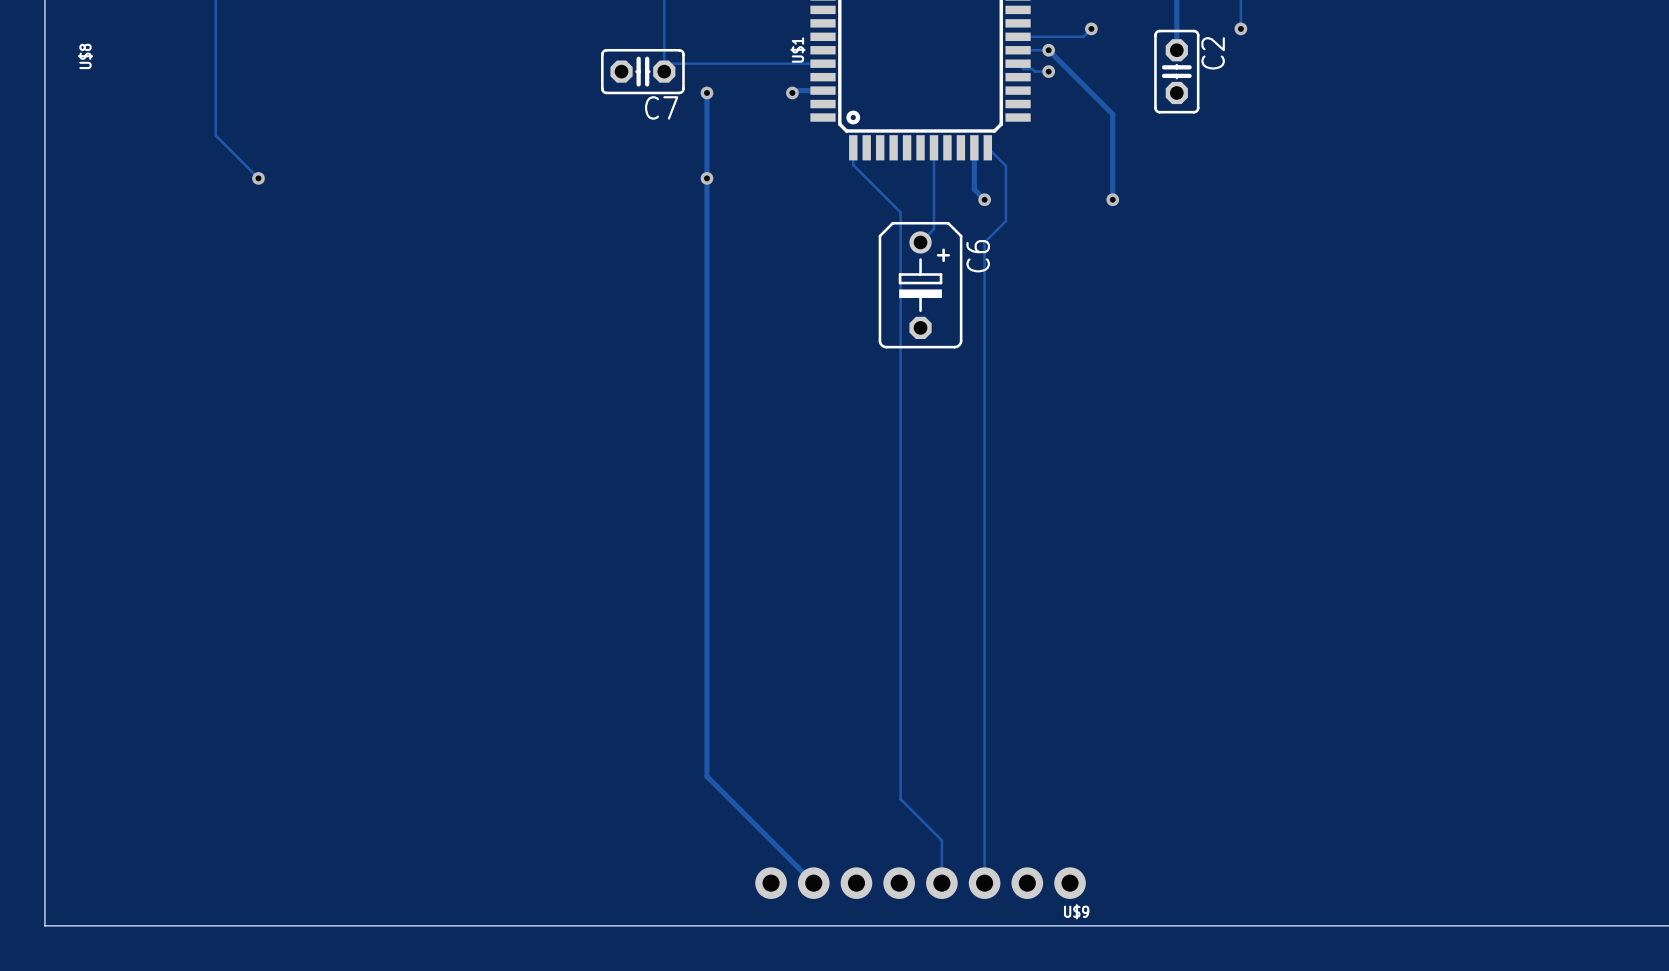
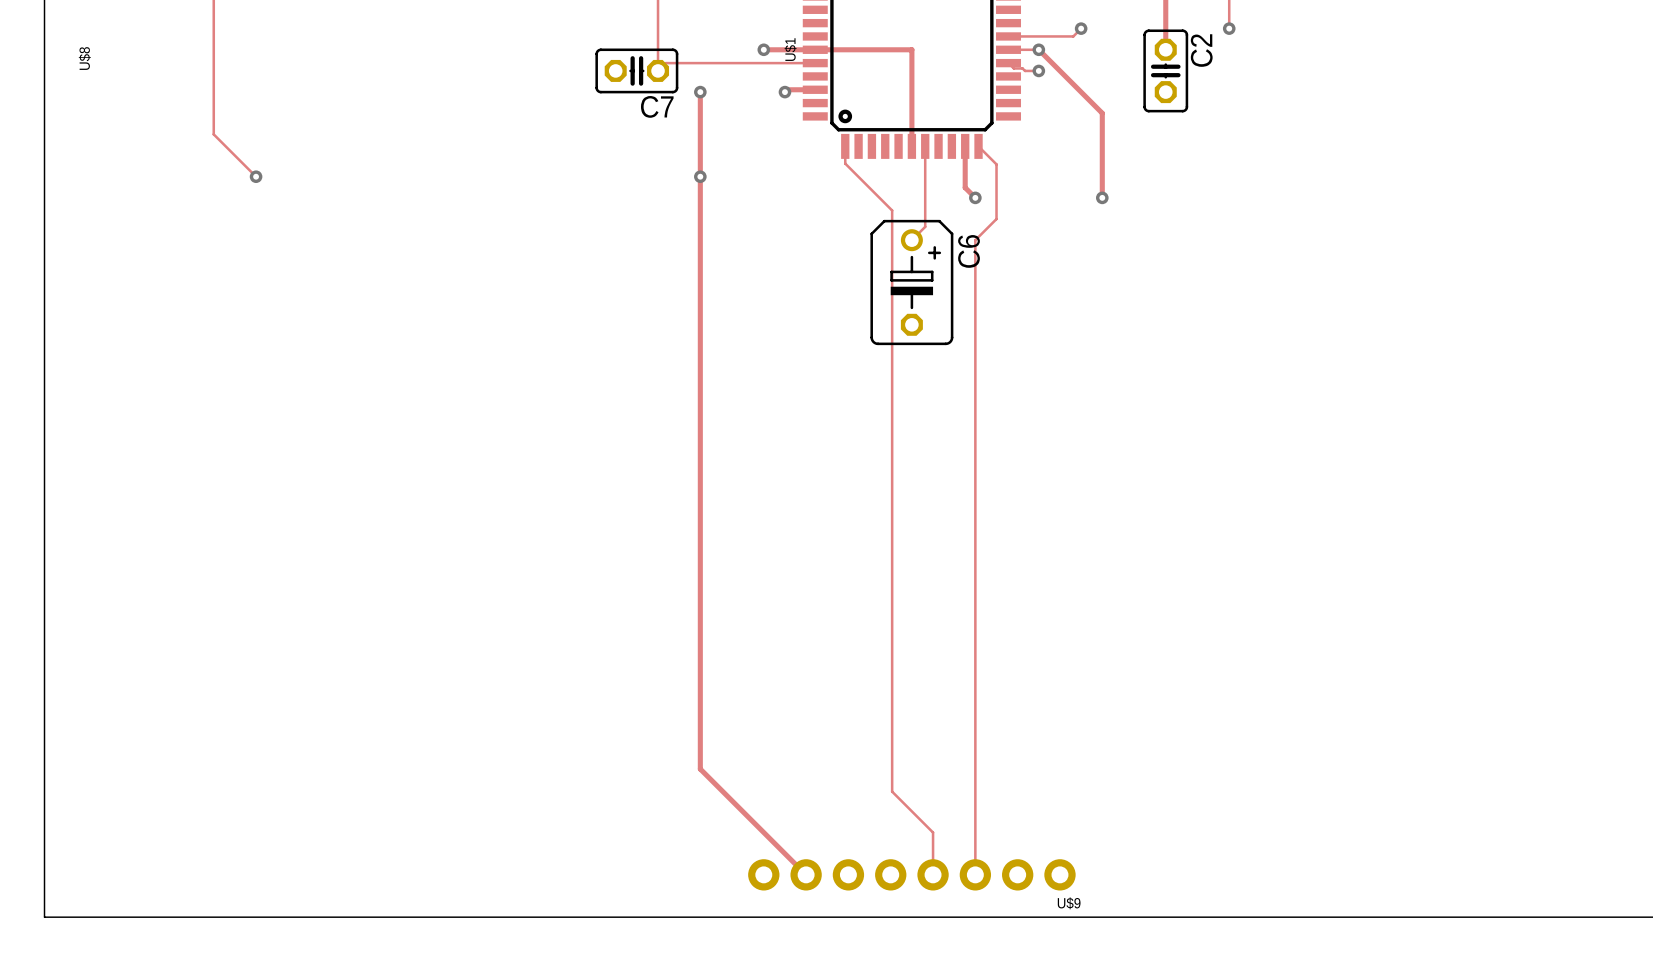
track: none -> (763, 49) (911, 49) (911, 146)
via: none -> (763, 49)

